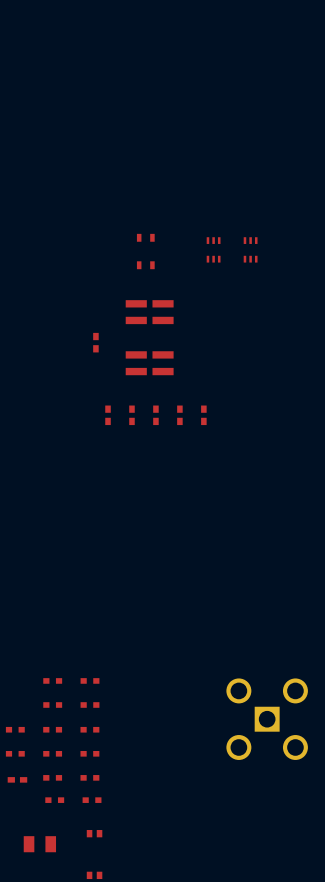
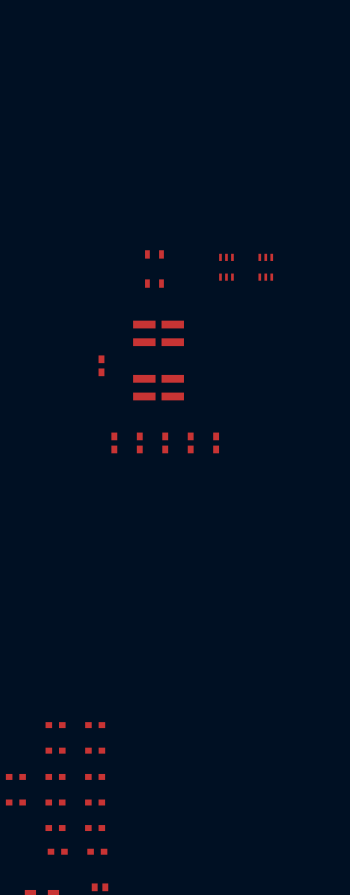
part: (267, 719) -> none
part: (17, 779) -> none

